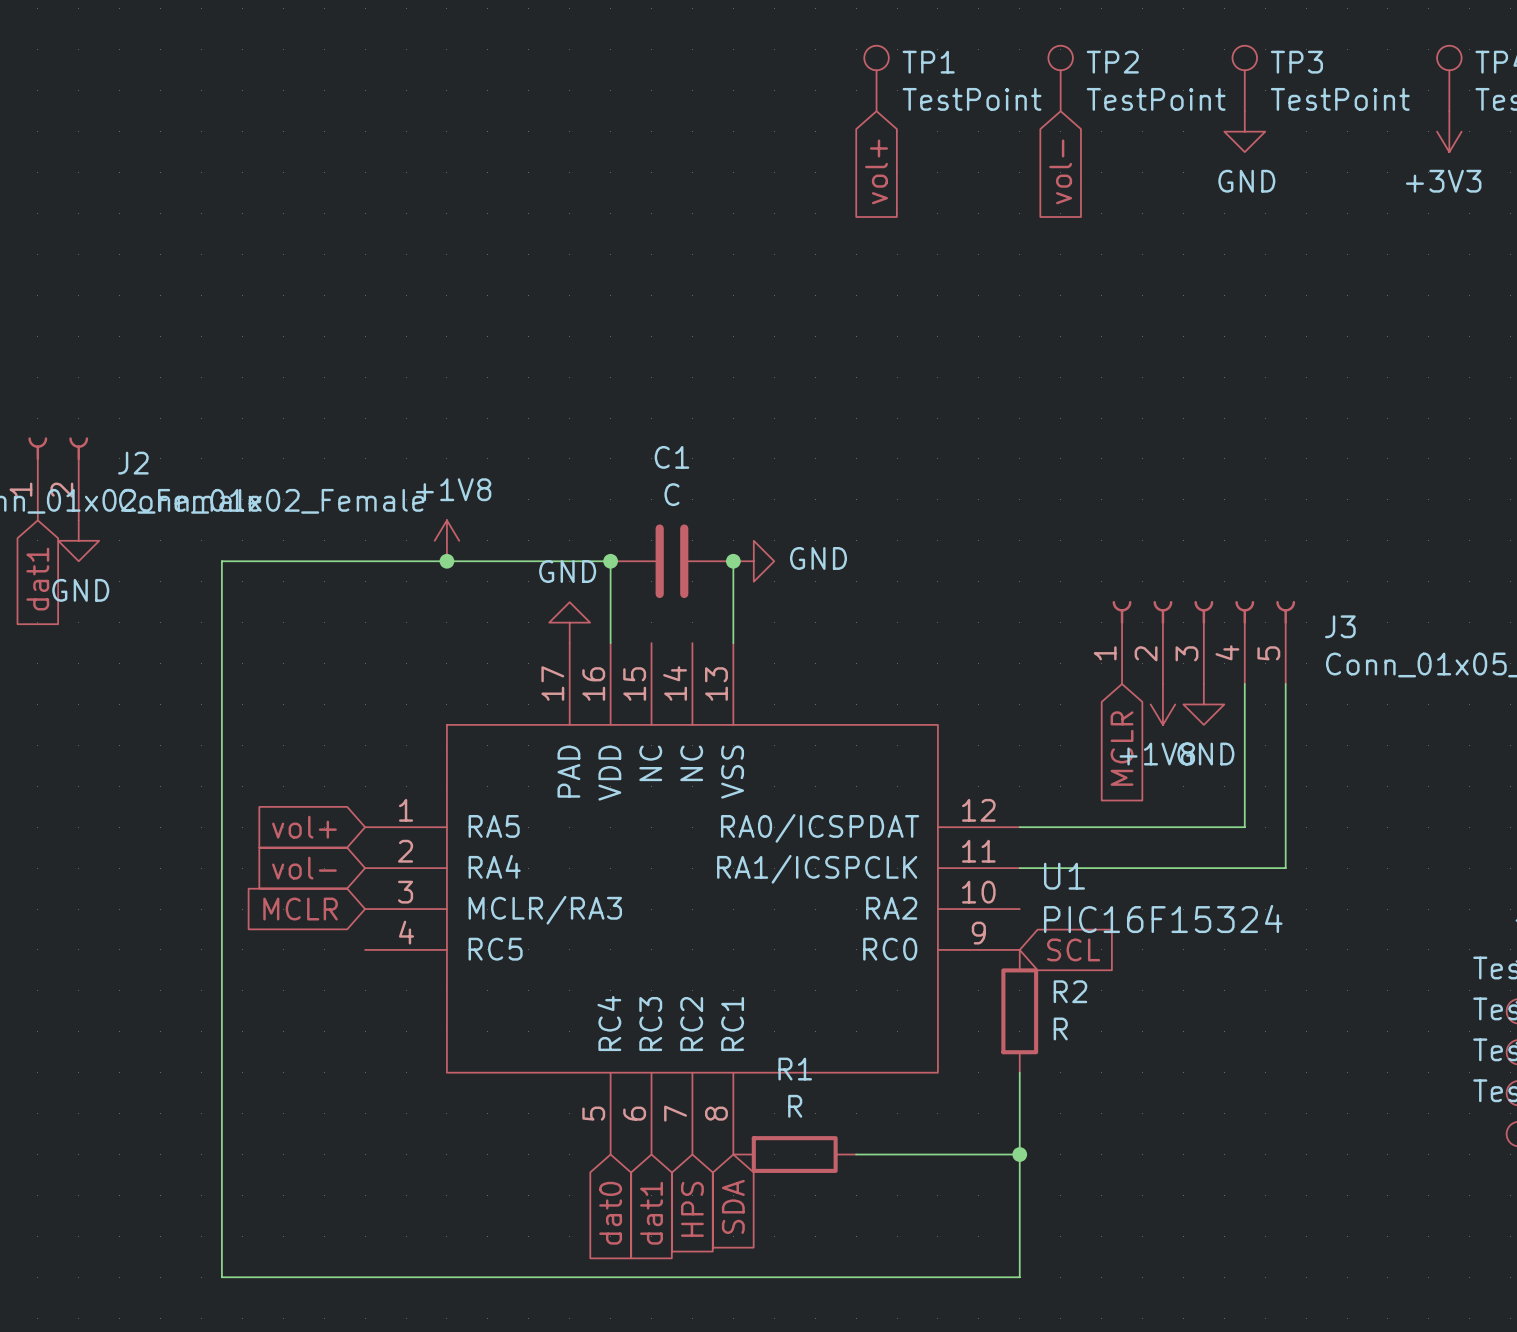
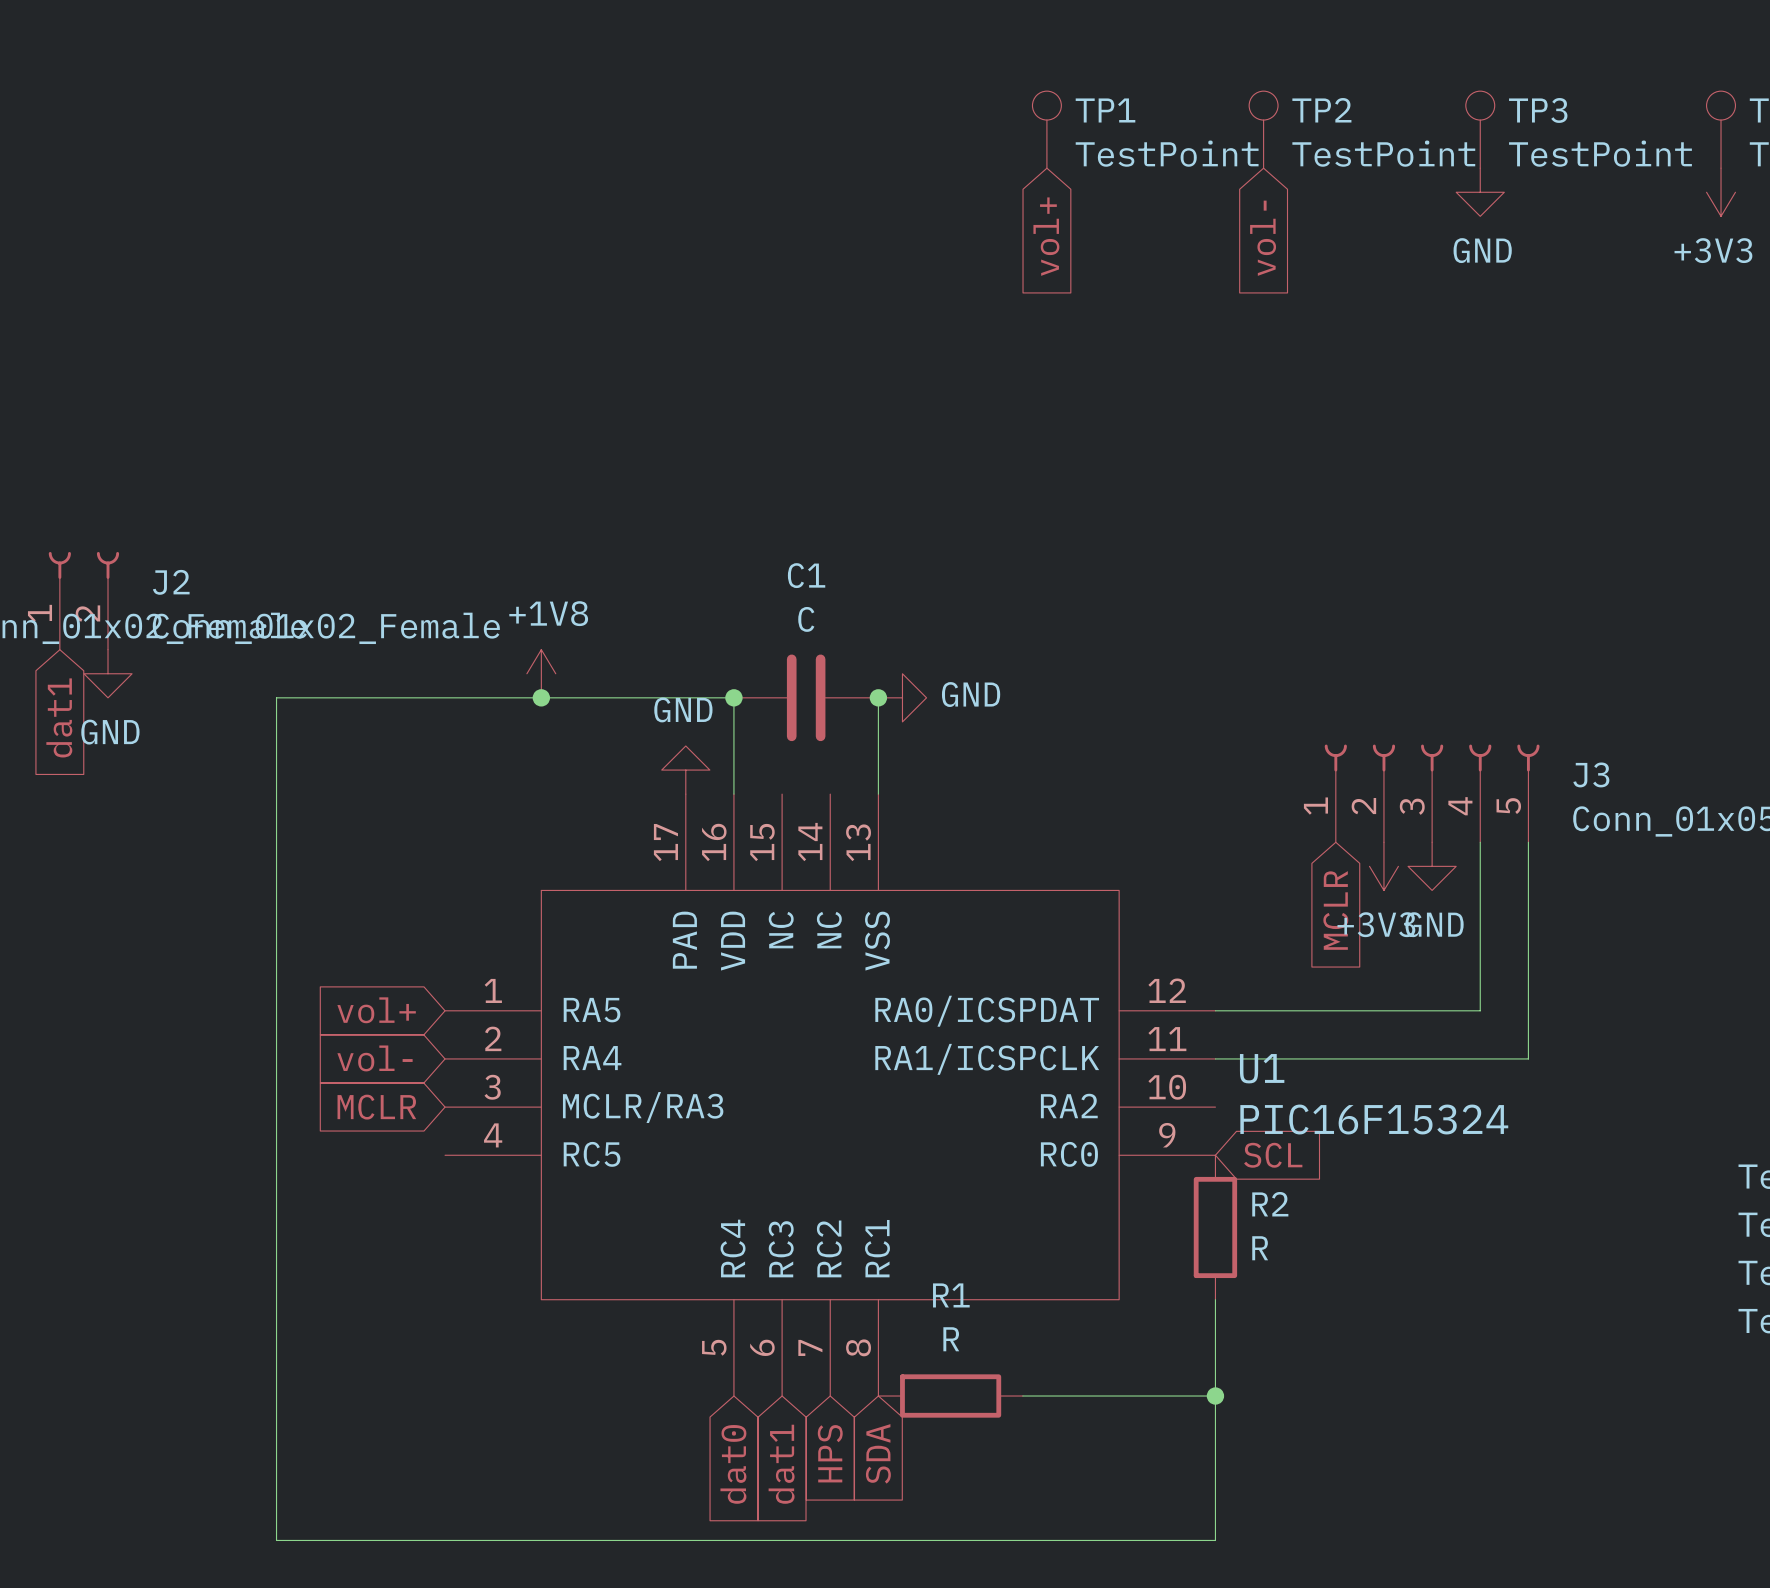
power symbol: +1V8 (1162, 704) -> +3V3 (1383, 866)

